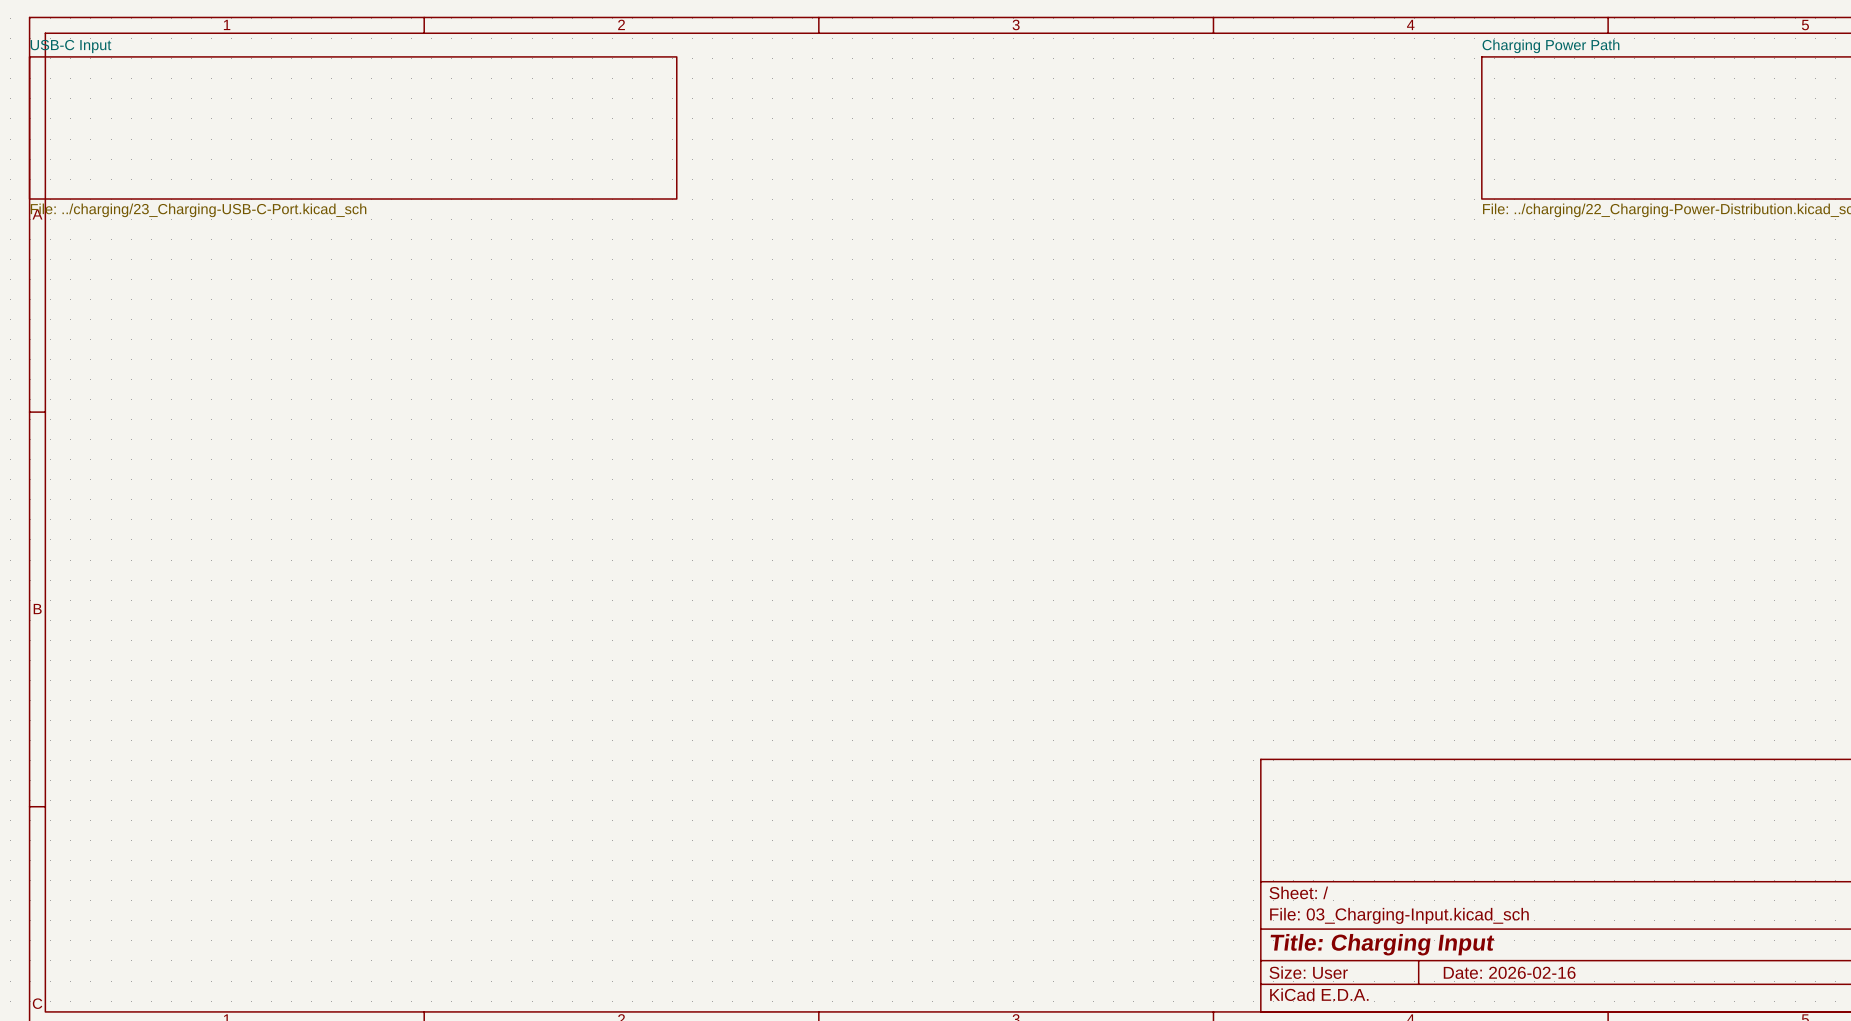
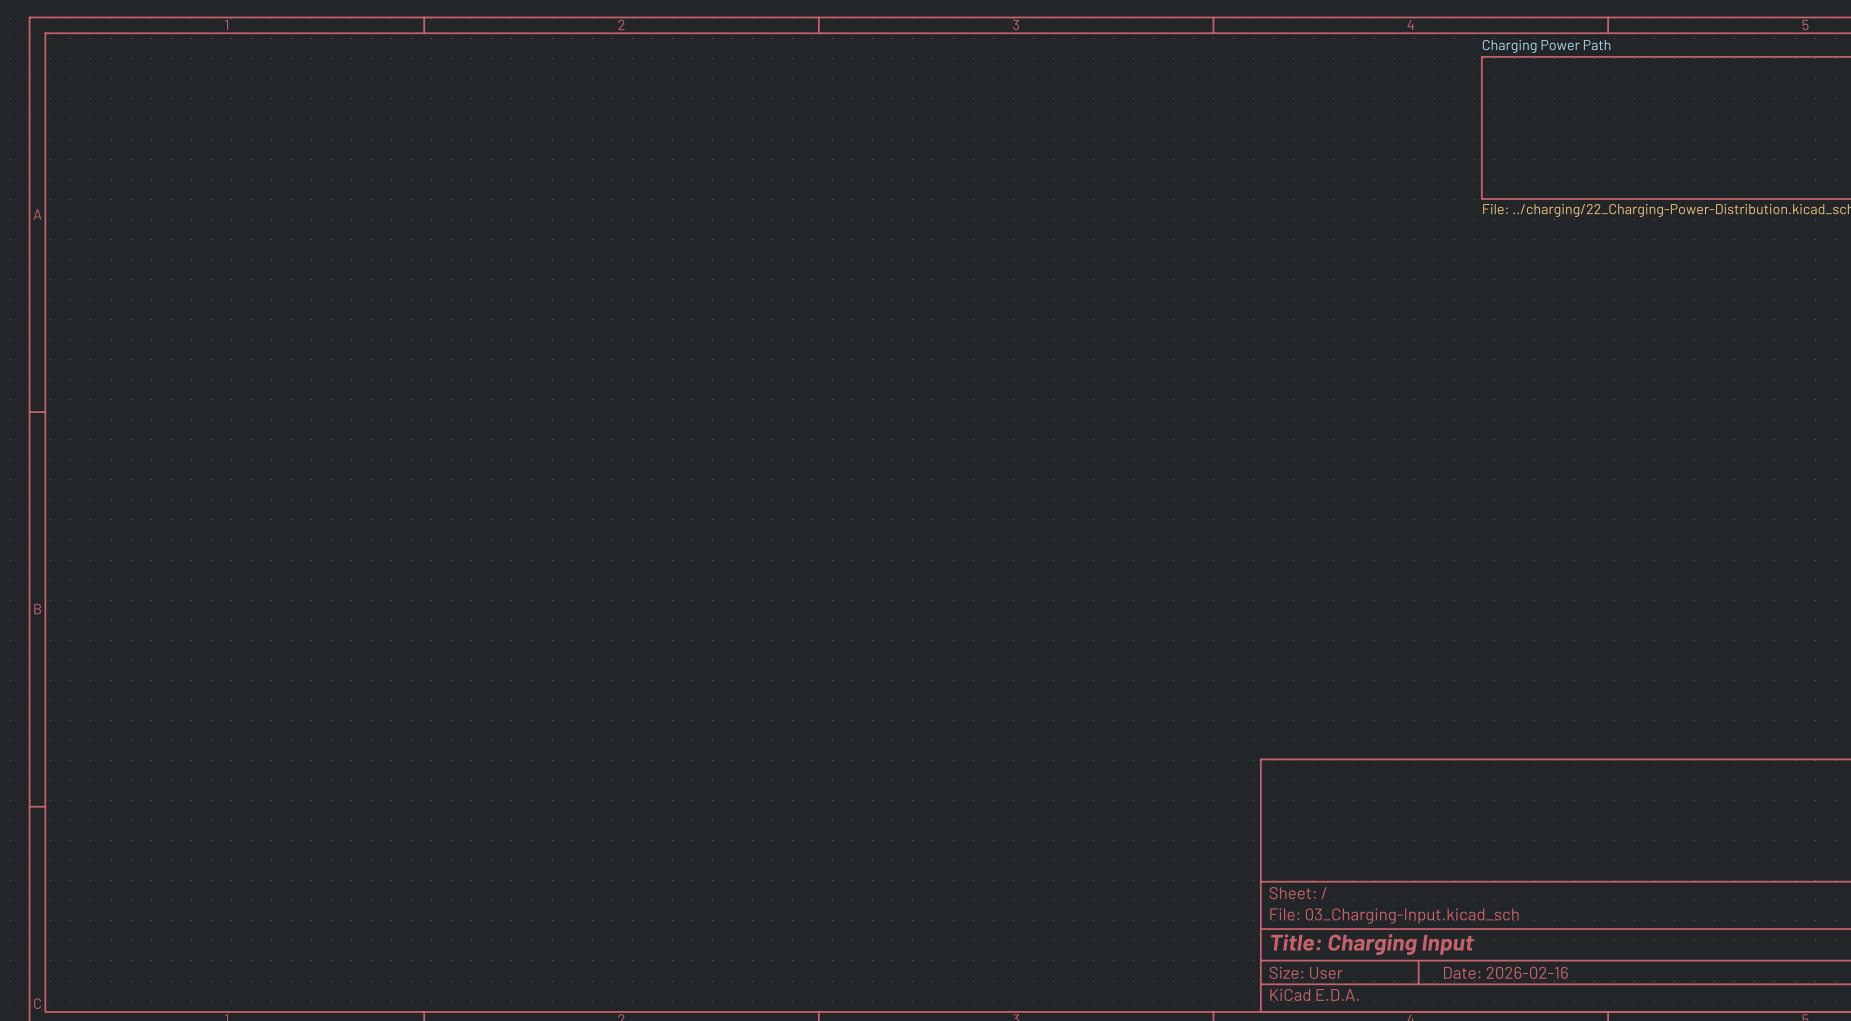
sheet USB-C Input: File: ../charging/23_Charging-USB-C-Port.kicad_sch (353, 127) -> none

